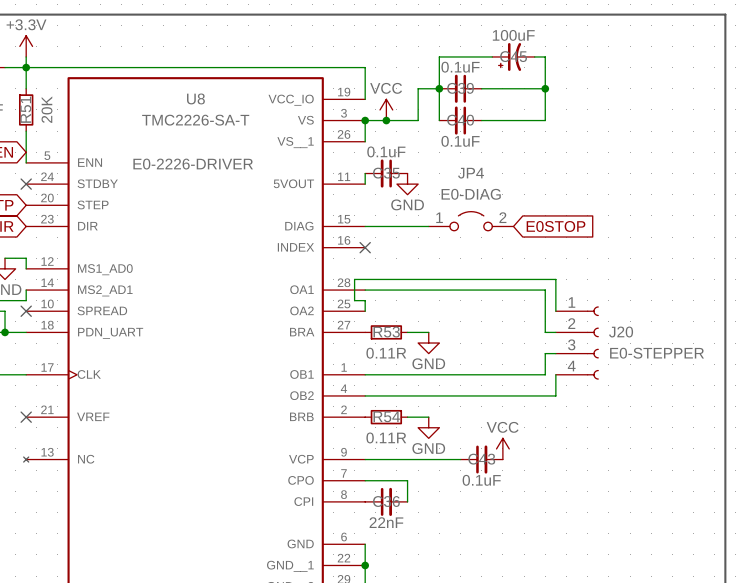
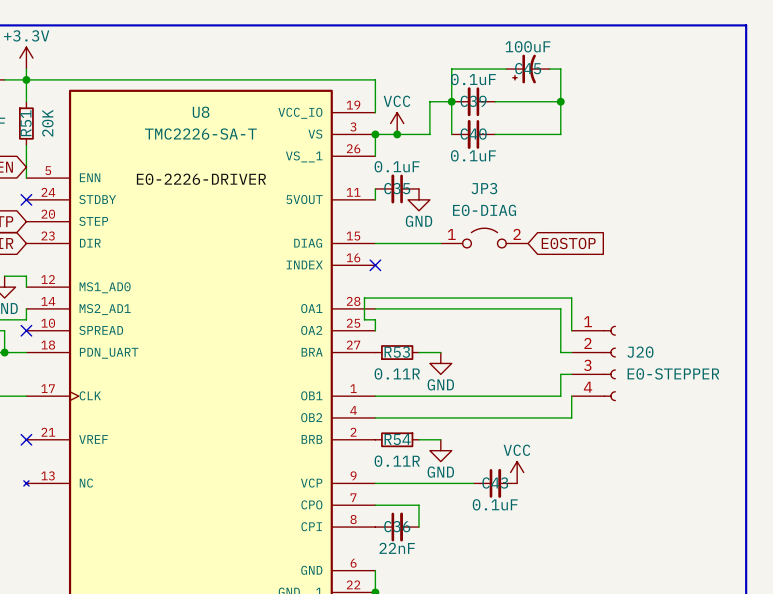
JP4 name: JP4 (471, 173) -> JP3 (484, 188)

